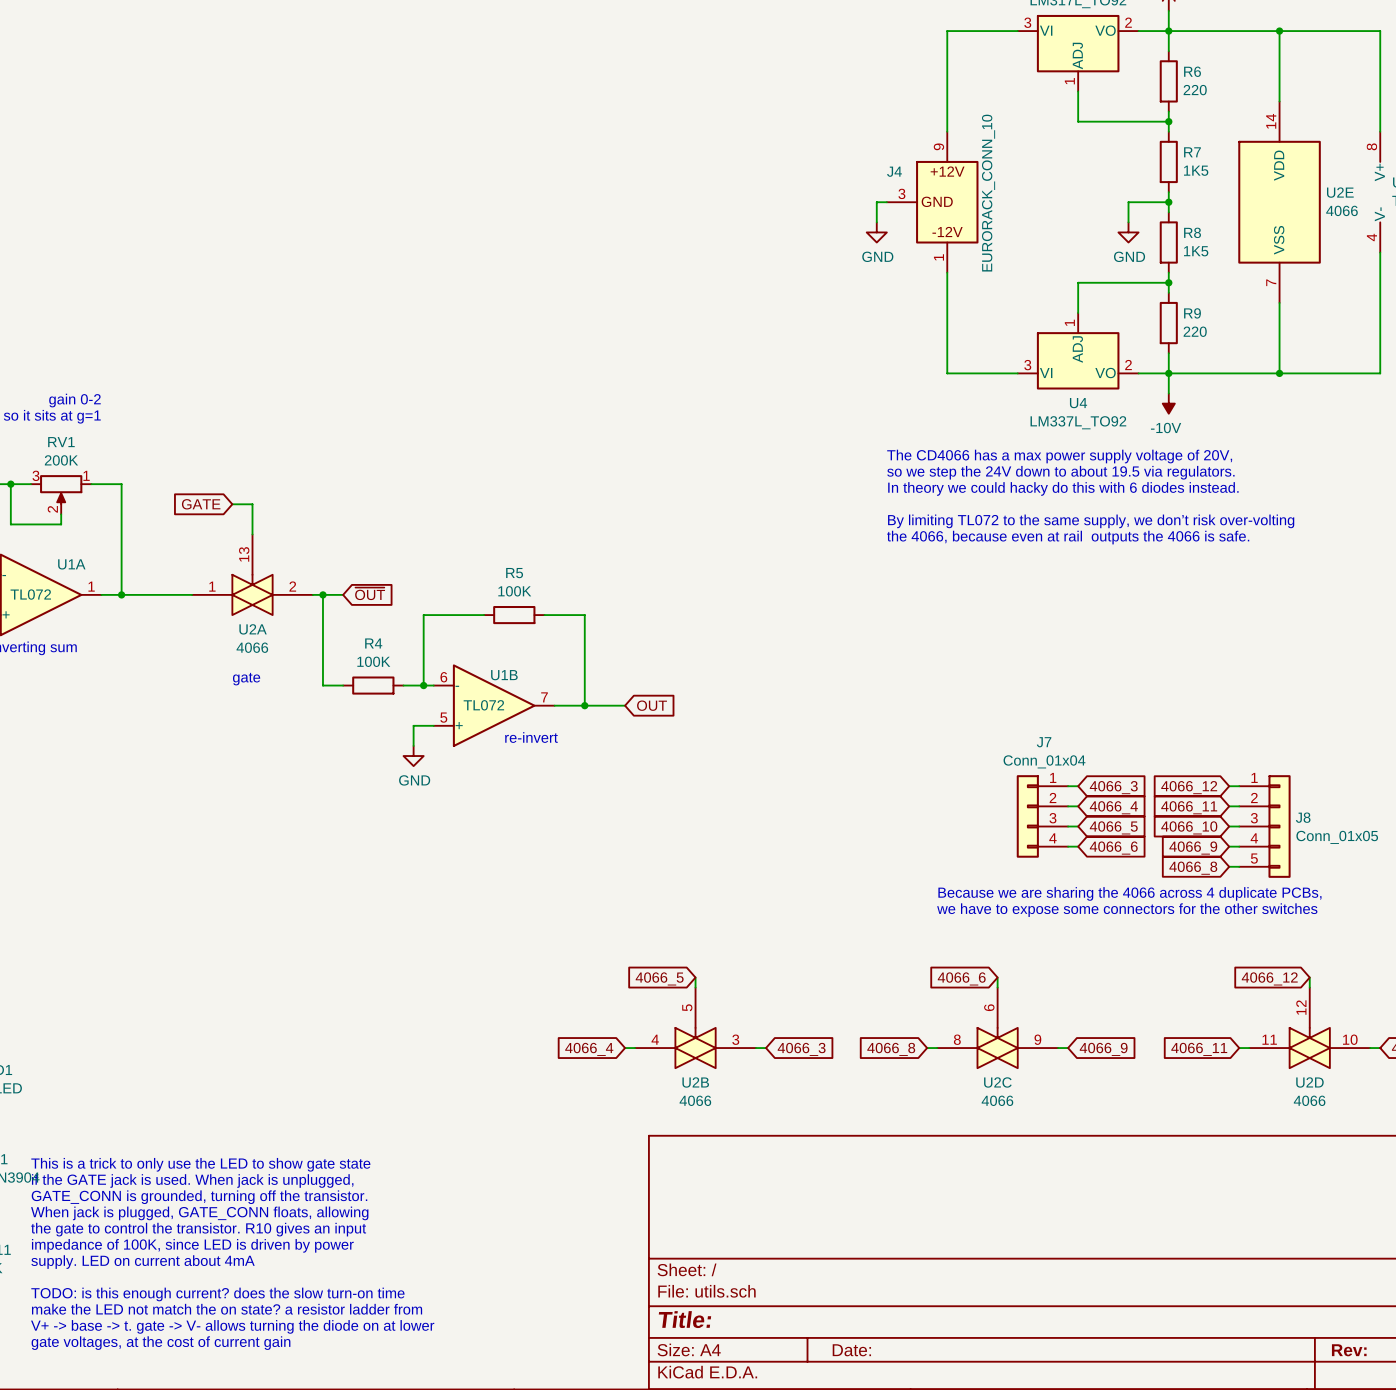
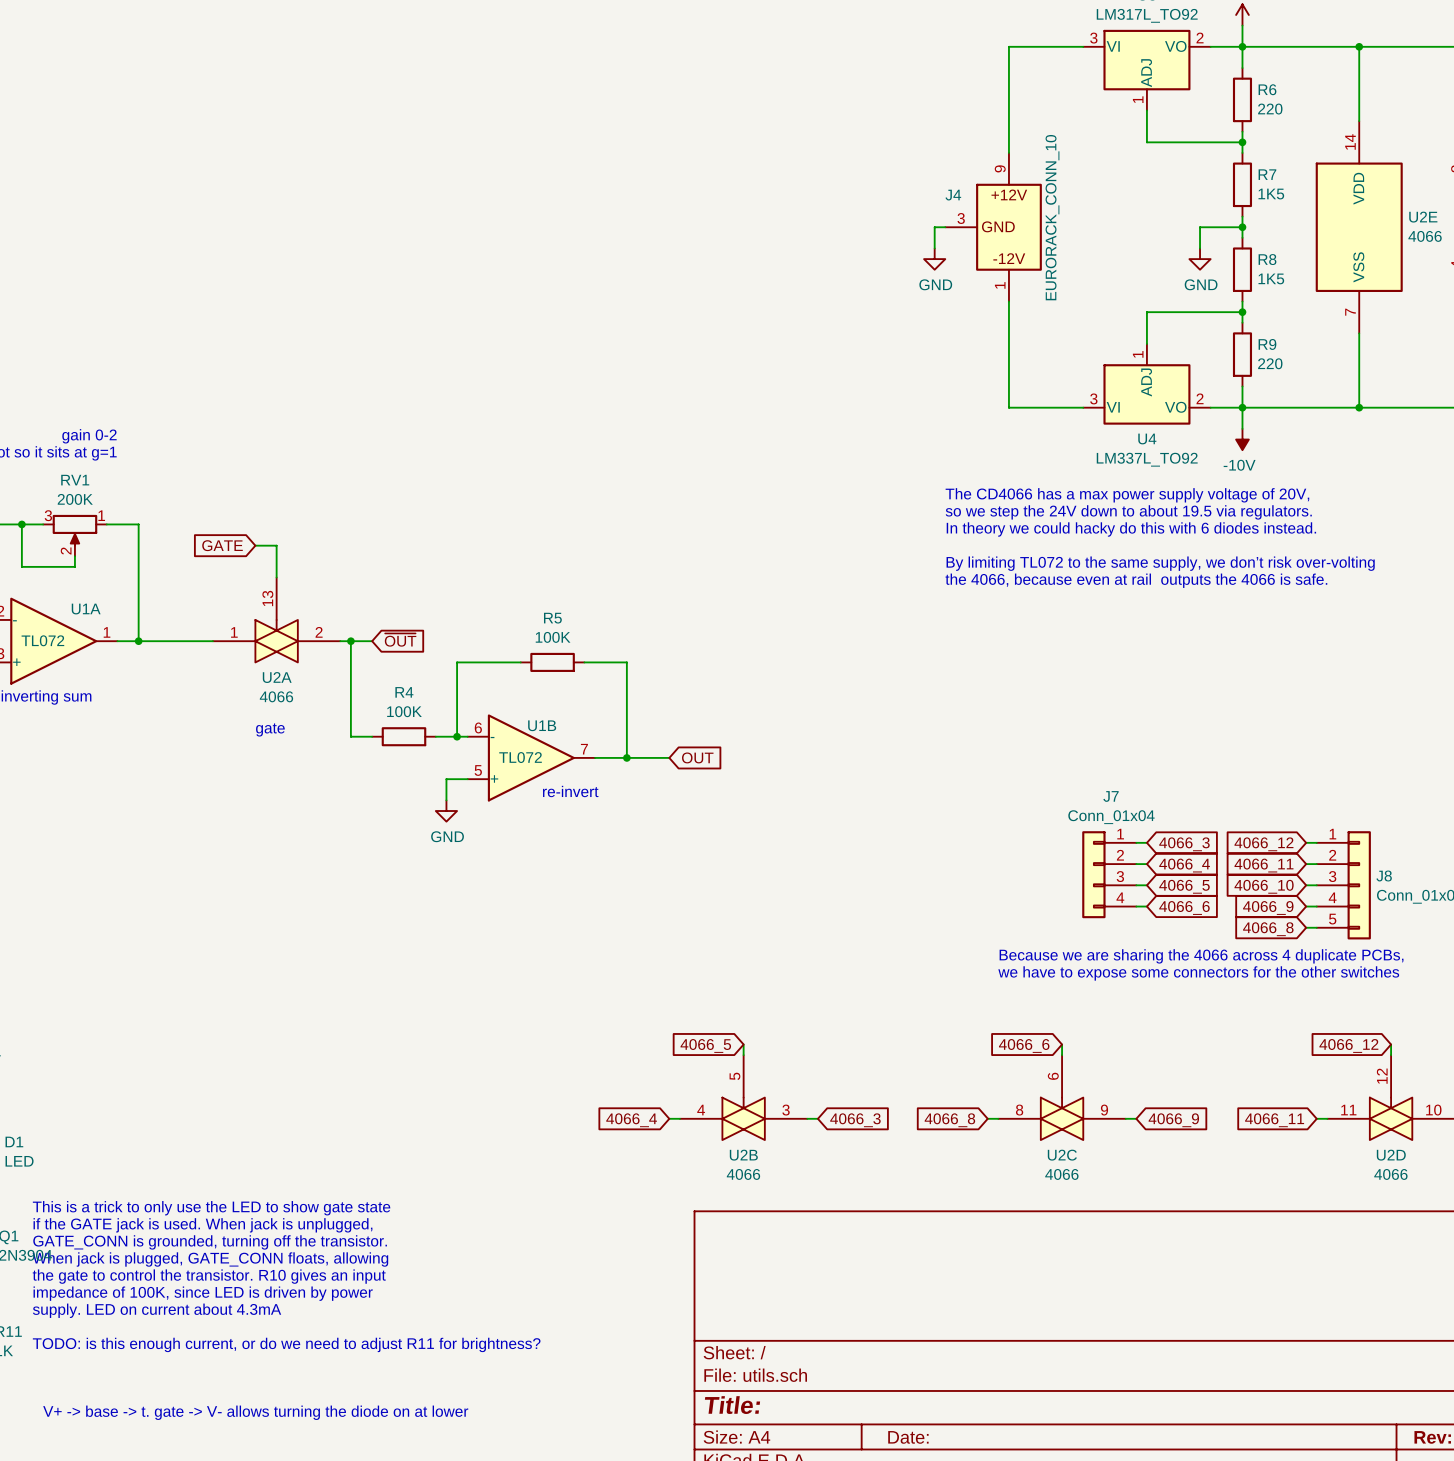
text position: This is a trick to only use the LED to show gate state (200, 1164) -> This is a trick to only use the LED to show gate state (211, 1208)
text position: if the GATE jack is used. When jack is unplugged, (192, 1180) -> if the GATE jack is used. When jack is unplugged, (202, 1225)
text position: GATE_CONN is grounded, turning off the transistor. (199, 1197) -> GATE_CONN is grounded, turning off the transistor. (210, 1242)
text position: When jack is plugged, GATE_CONN floats, allowing (199, 1213) -> When jack is plugged, GATE_CONN floats, allowing (210, 1259)
text position: the gate to control the transistor. R10 gives an input (198, 1229) -> the gate to control the transistor. R10 gives an input (209, 1276)
text: none -> supply. LED on current about 4.3mA (157, 1310)
text position: impedance of 100K, since LED is driven by power (192, 1245) -> impedance of 100K, since LED is driven by power (203, 1293)
text: supply. LED on current about 4mA (143, 1262) -> none
text: none -> TODO: is this enough current, or do we need to adjust R11 for brightness? (286, 1344)
text: TODO: is this enough current? does the slow turn-on time (217, 1294) -> none
text: make the LED not match the on state? a resistor ladder from (227, 1309) -> none
text: gate voltages, at the cost of current gain (160, 1343) -> none

